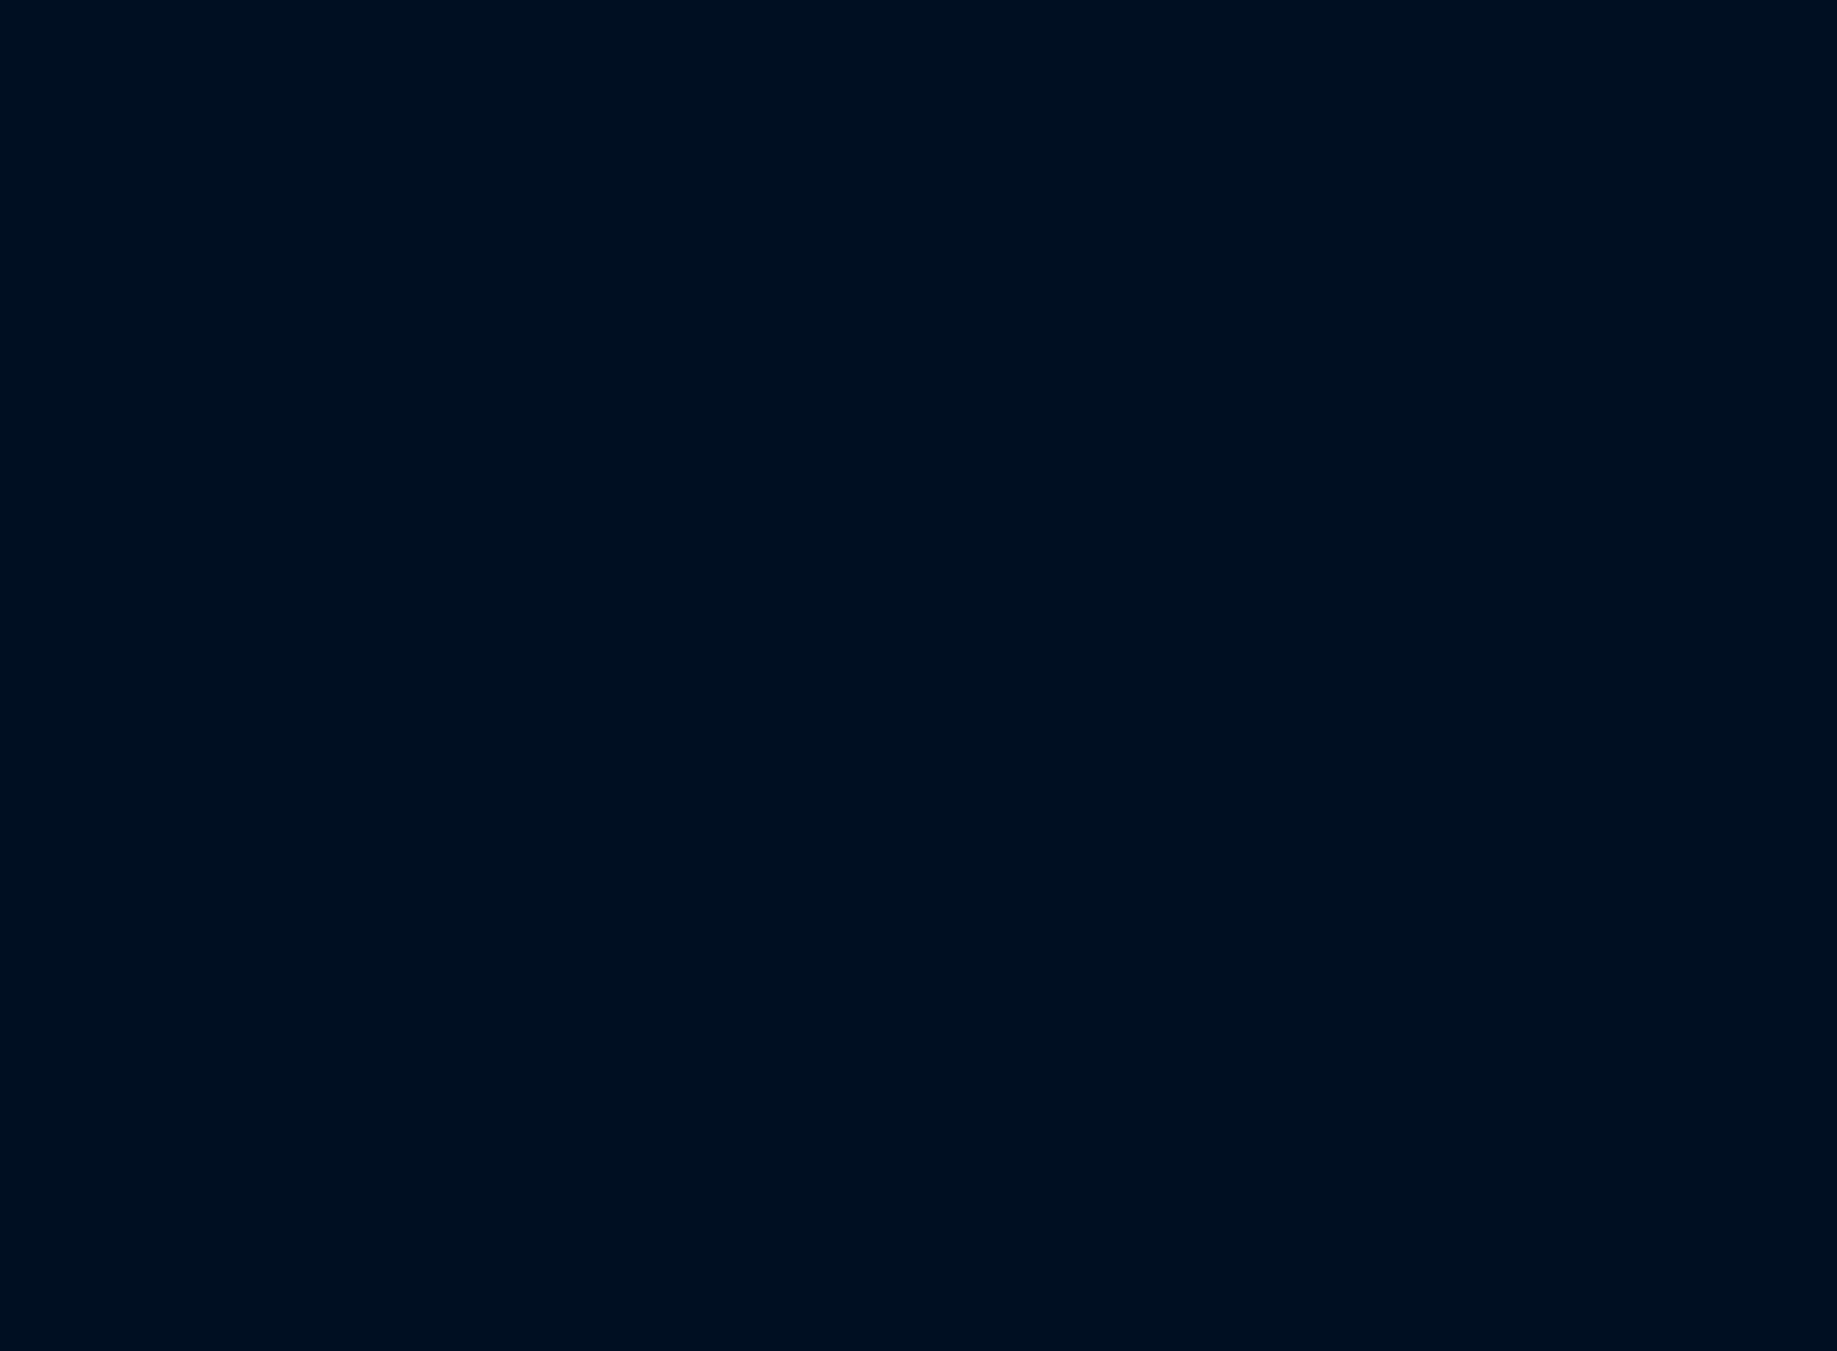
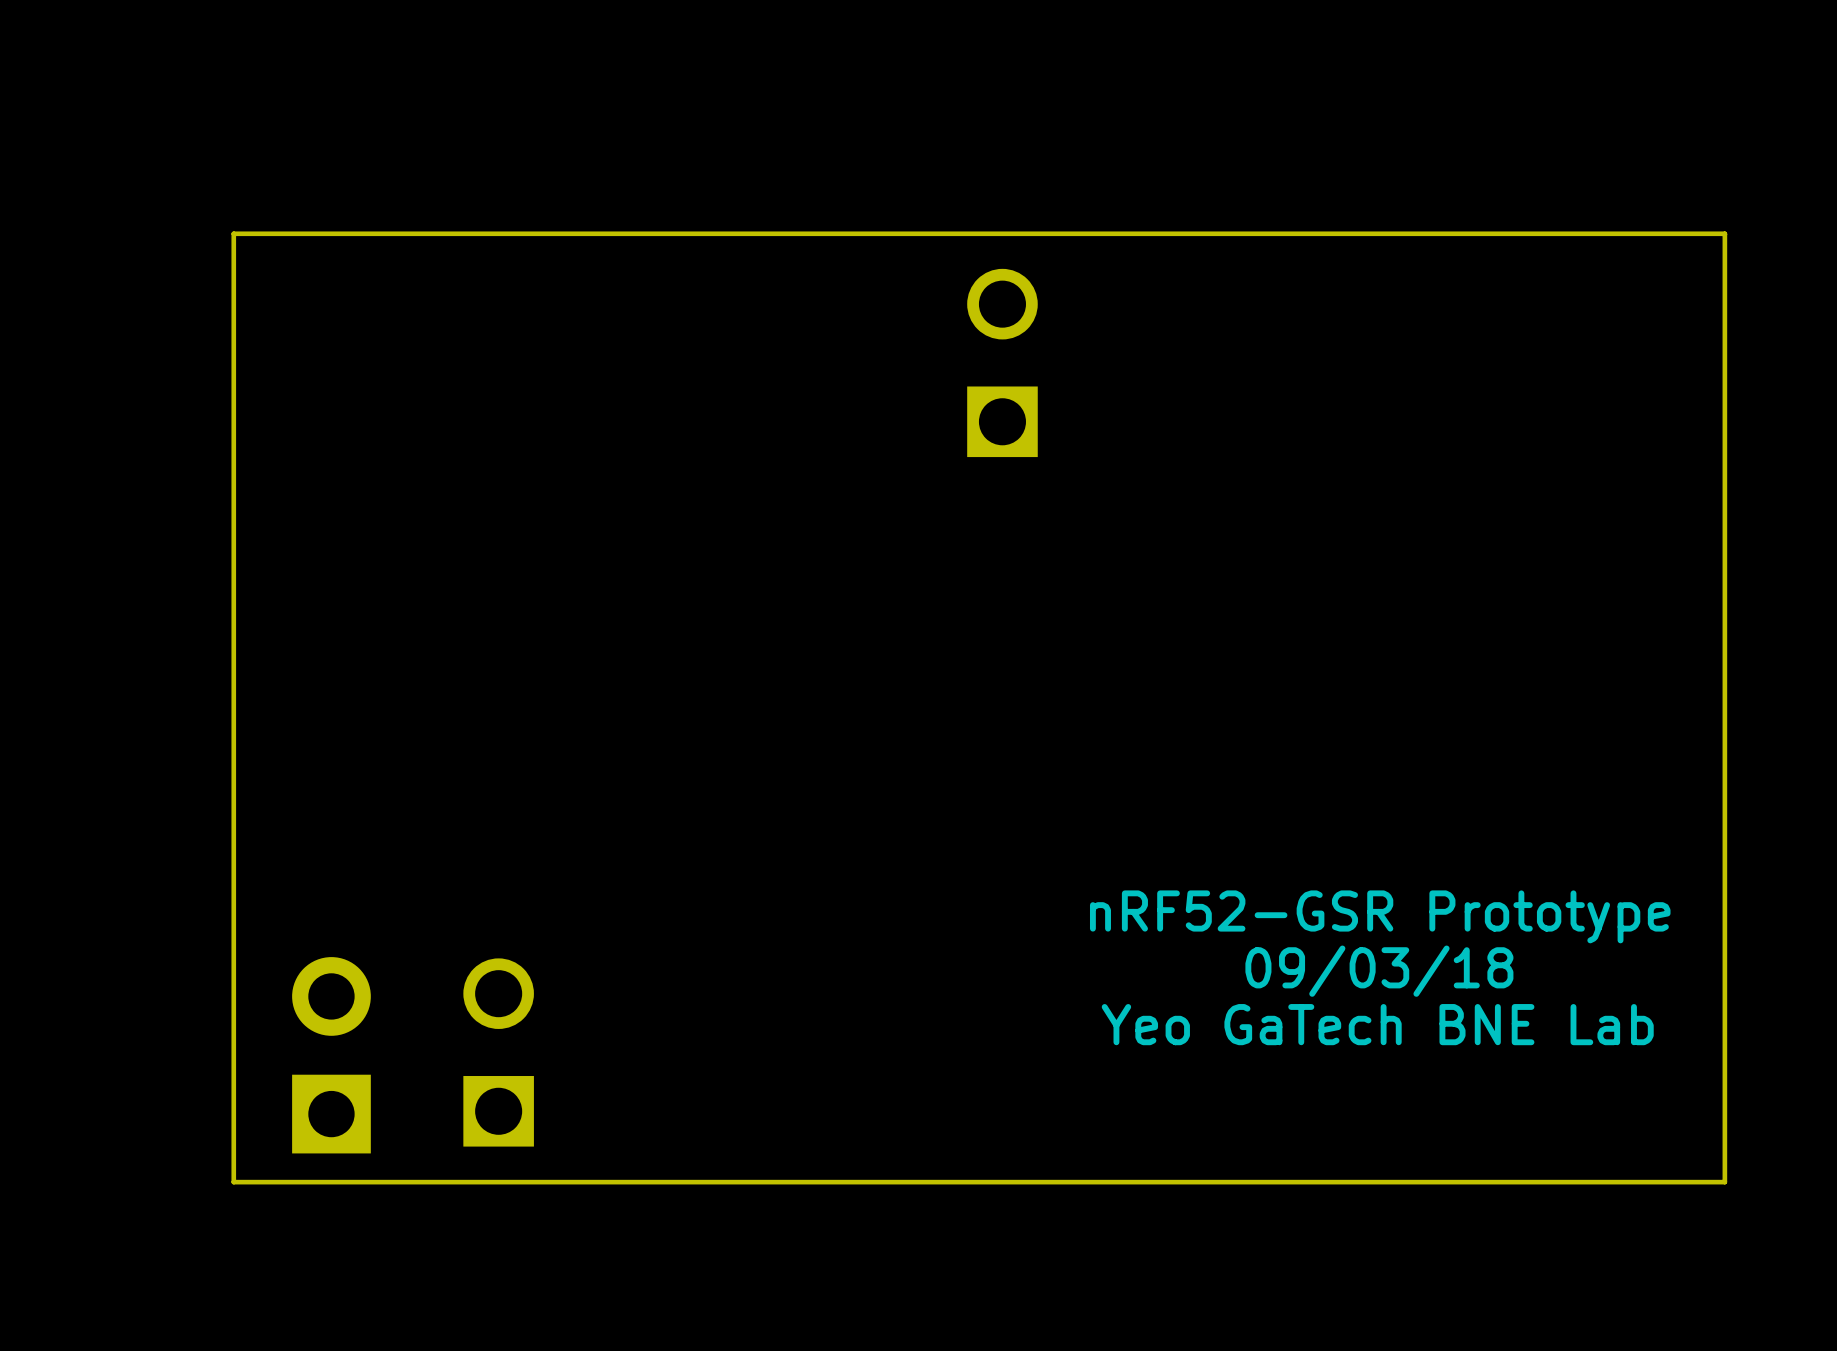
board edge: none -> (1724, 233) (1724, 1182) (233, 1182) (233, 233) (1724, 233)
part: none -> (1002, 362)
text: none -> nRF52-GSR Prototype (1380, 916)
text: none -> 09/03/18 (1379, 971)
text: none -> Yeo GaTech BNE Lab (1377, 1024)
part: none -> (498, 1052)
part: none -> (331, 1055)

